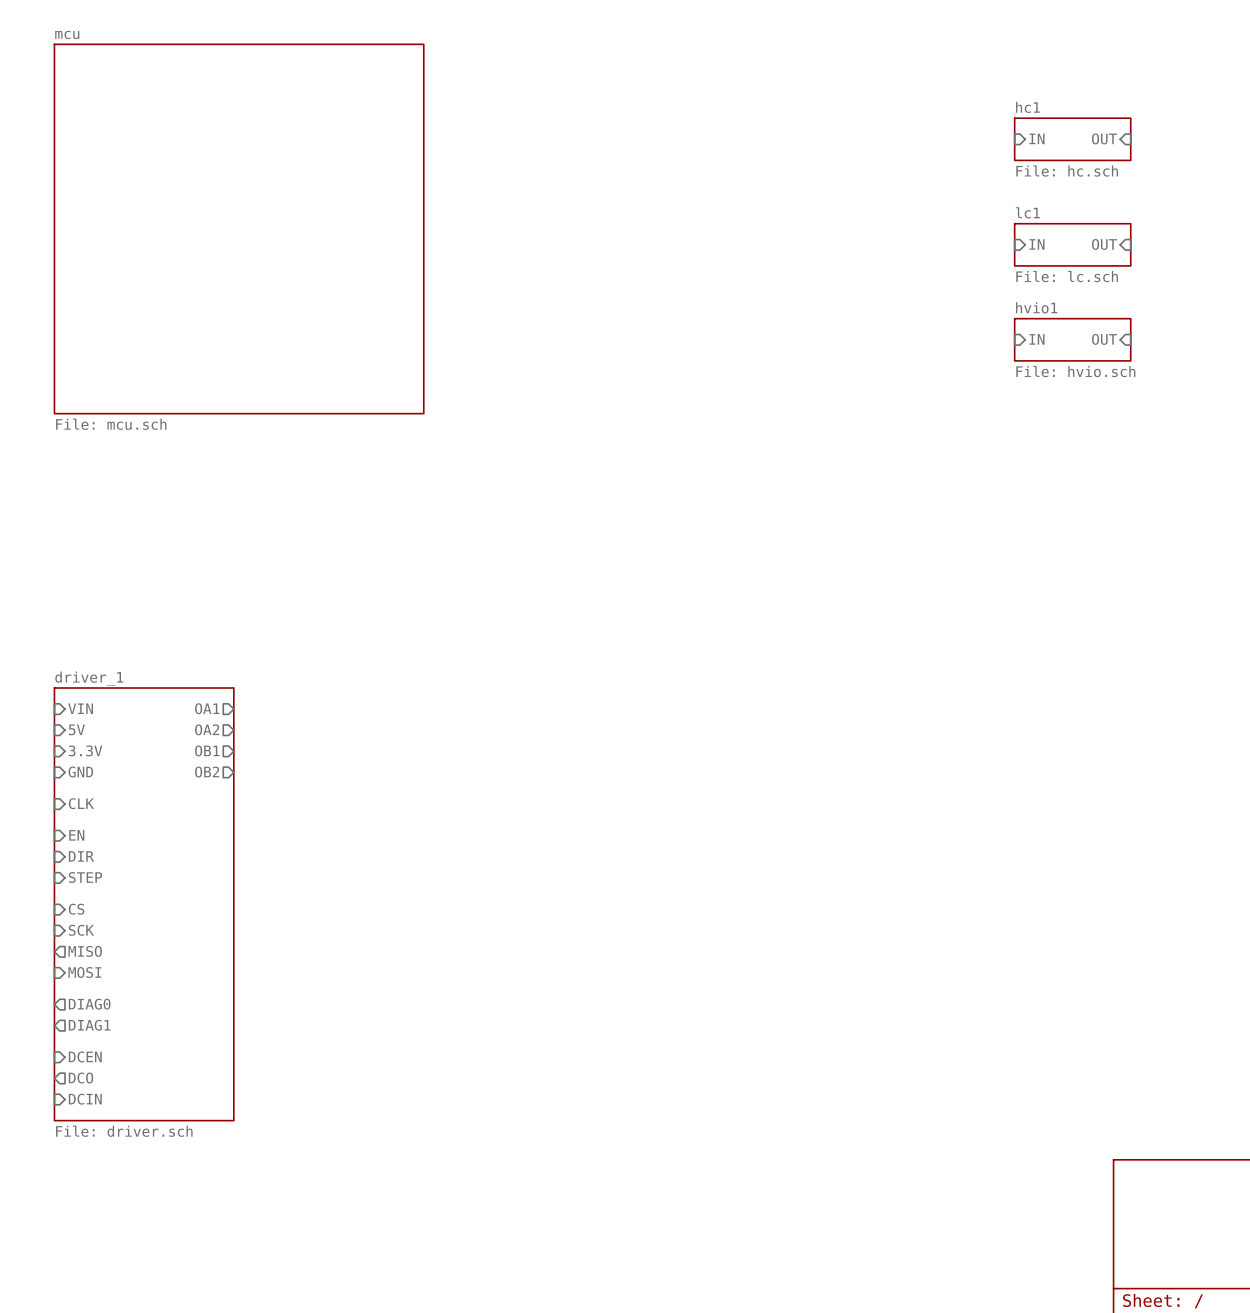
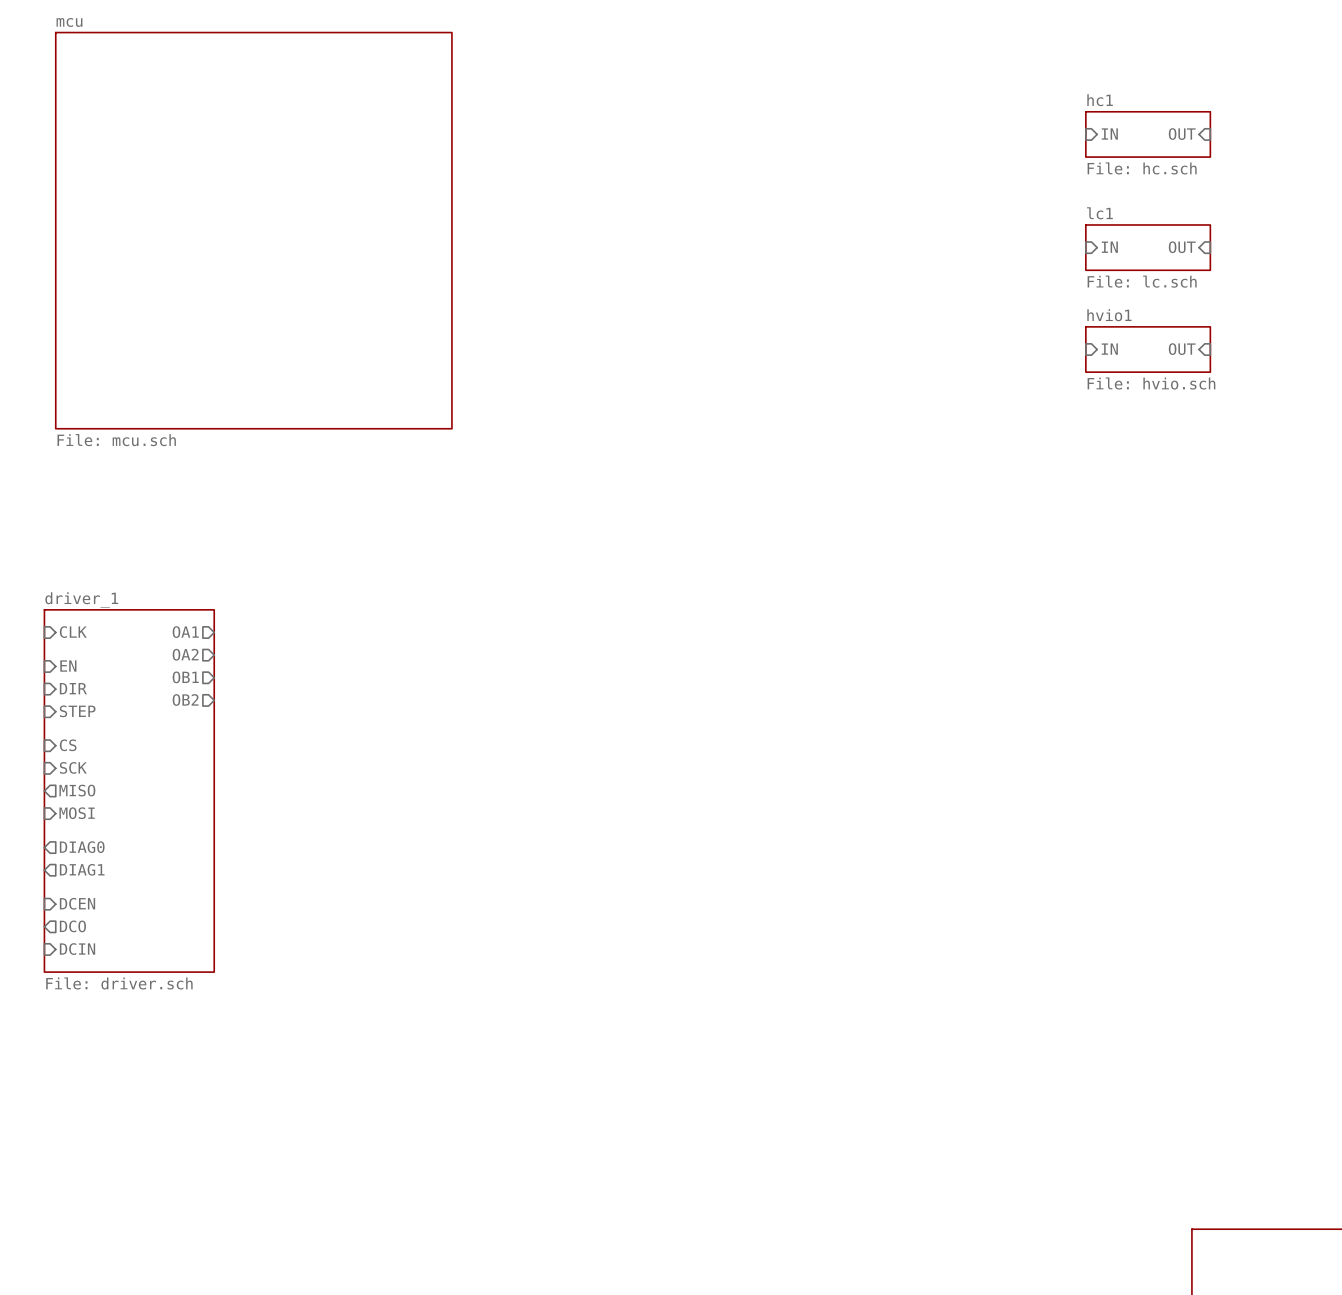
sheet driver_1 name position: driver_1 (89, 678) -> driver_1 (81, 599)
sheet driver_1 shape: [54, 688, 234, 1121] -> [44, 609, 215, 973]
sheet pin: VIN (80, 708) -> none
sheet pin position: OA1 (207, 708) -> OA1 (185, 632)
sheet pin: 5V (76, 729) -> none
sheet pin position: OA2 (207, 729) -> OA2 (185, 654)
sheet pin: 3.3V (85, 750) -> none
sheet pin position: OB1 (207, 750) -> OB1 (185, 677)
sheet pin: GND (80, 772) -> none
sheet pin position: OB2 (207, 772) -> OB2 (185, 700)
sheet pin position: CLK (81, 803) -> CLK (73, 632)
sheet pin position: EN (76, 835) -> EN (68, 666)
sheet pin position: DIR (81, 856) -> DIR (73, 688)
sheet pin position: STEP (85, 877) -> STEP (77, 711)
sheet pin position: CS (76, 909) -> CS (68, 745)
sheet pin position: SCK (81, 930) -> SCK (73, 767)
sheet pin position: MISO (85, 951) -> MISO (77, 790)
sheet pin position: MOSI (84, 972) -> MOSI (77, 813)
sheet pin position: DIAG0 (89, 1004) -> DIAG0 (82, 847)
sheet pin position: DIAG1 (89, 1025) -> DIAG1 (82, 869)
sheet pin position: DCEN (85, 1056) -> DCEN (77, 903)
sheet pin position: DCO (80, 1078) -> DCO (72, 926)
sheet pin position: DCIN (85, 1099) -> DCIN (77, 949)
sheet driver_1 value position: File: driver.sch (124, 1131) -> File: driver.sch (119, 983)

